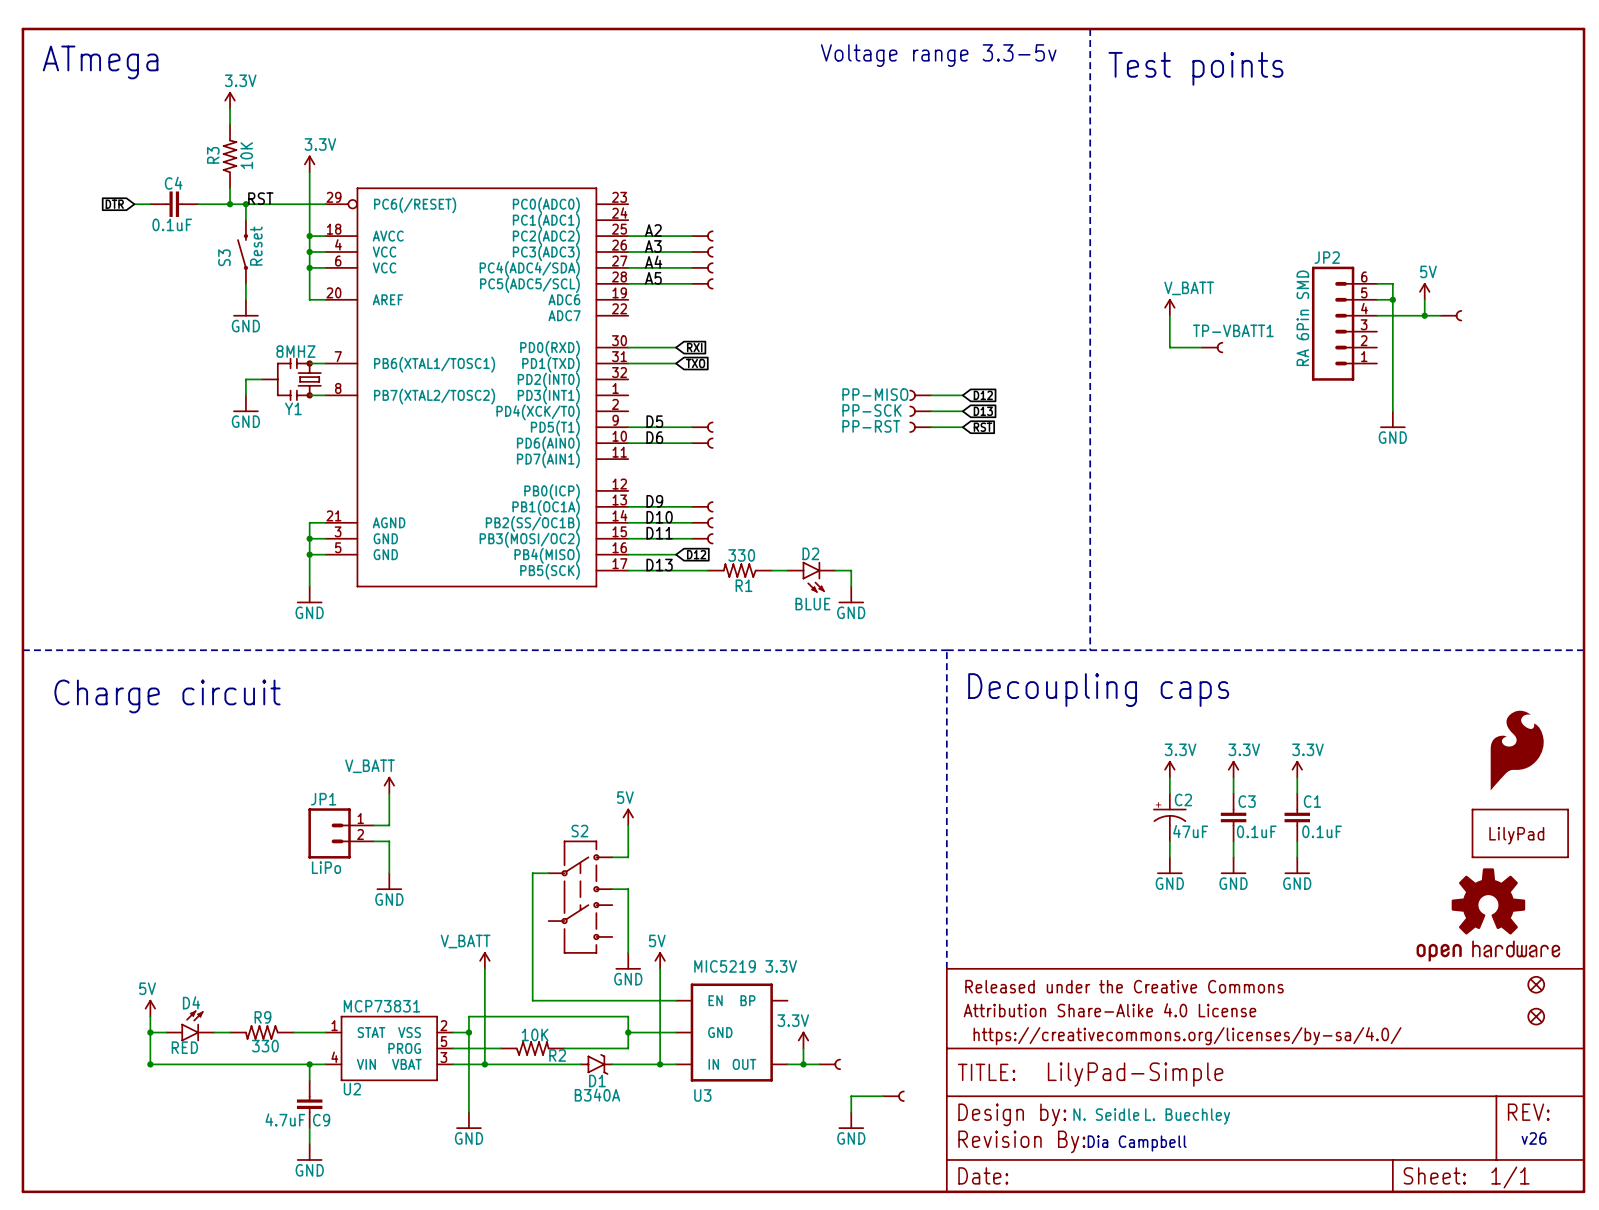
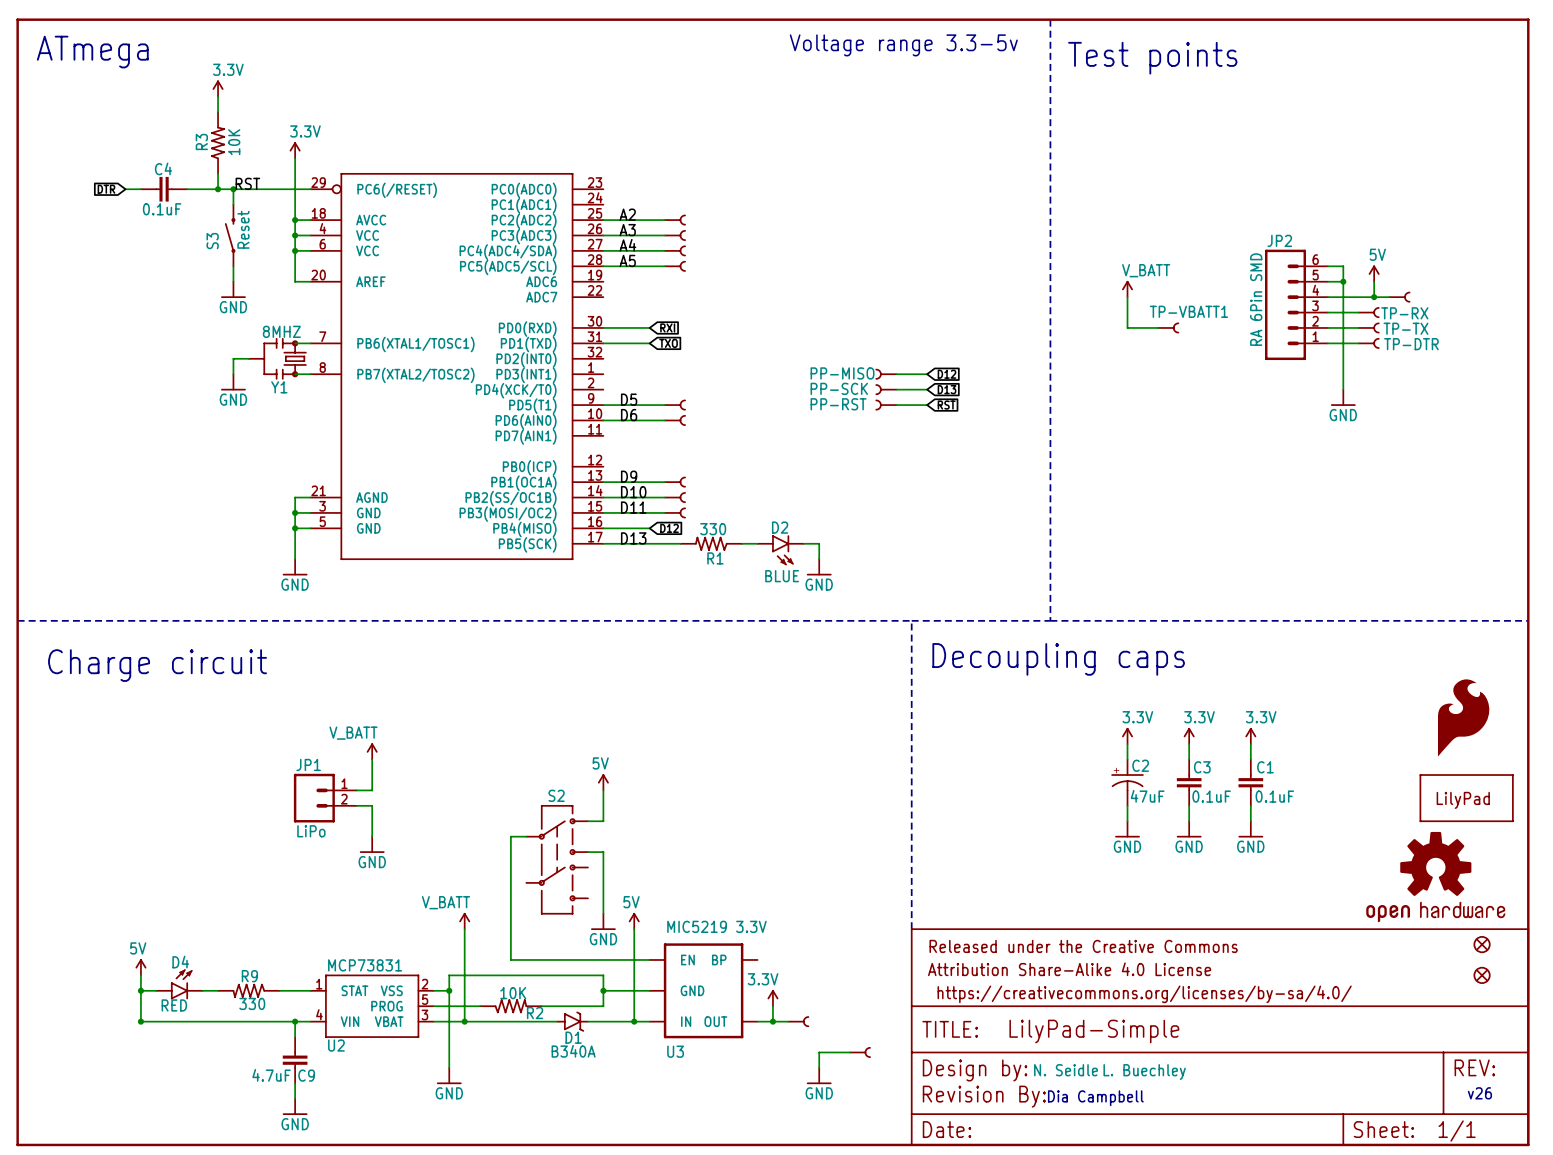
wire: none -> (1327, 312) (1358, 312)
TP-RX: none -> (1368, 312)
wire: none -> (1327, 327) (1358, 327)
TP-TX: none -> (1368, 327)
wire: none -> (1327, 343) (1358, 343)
TP-DTR: none -> (1368, 343)

